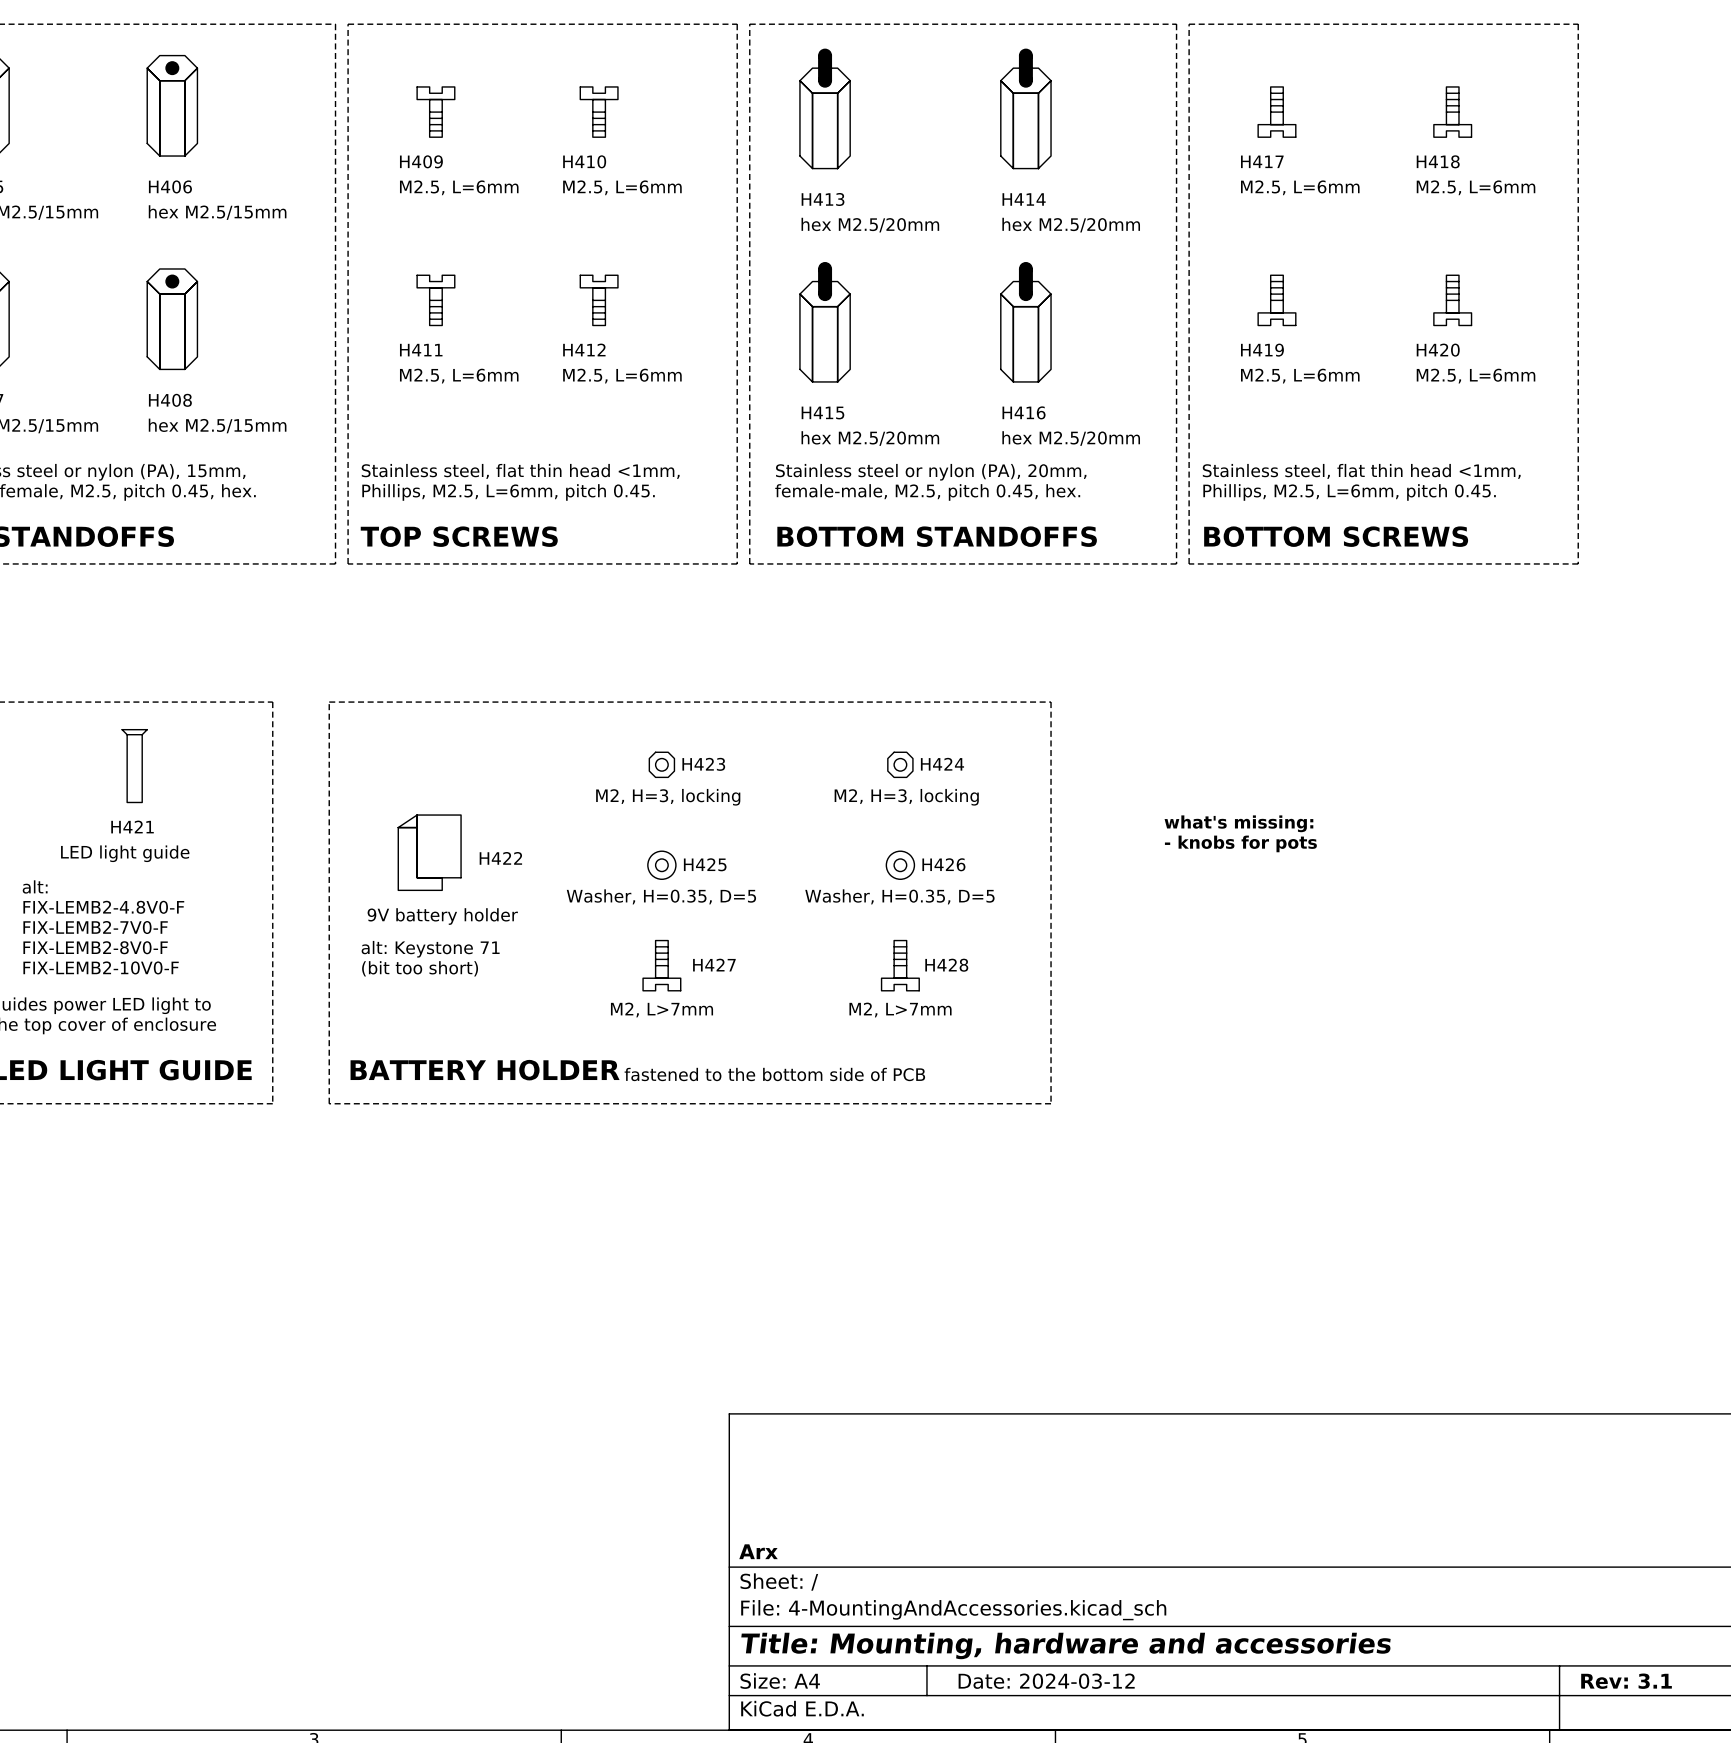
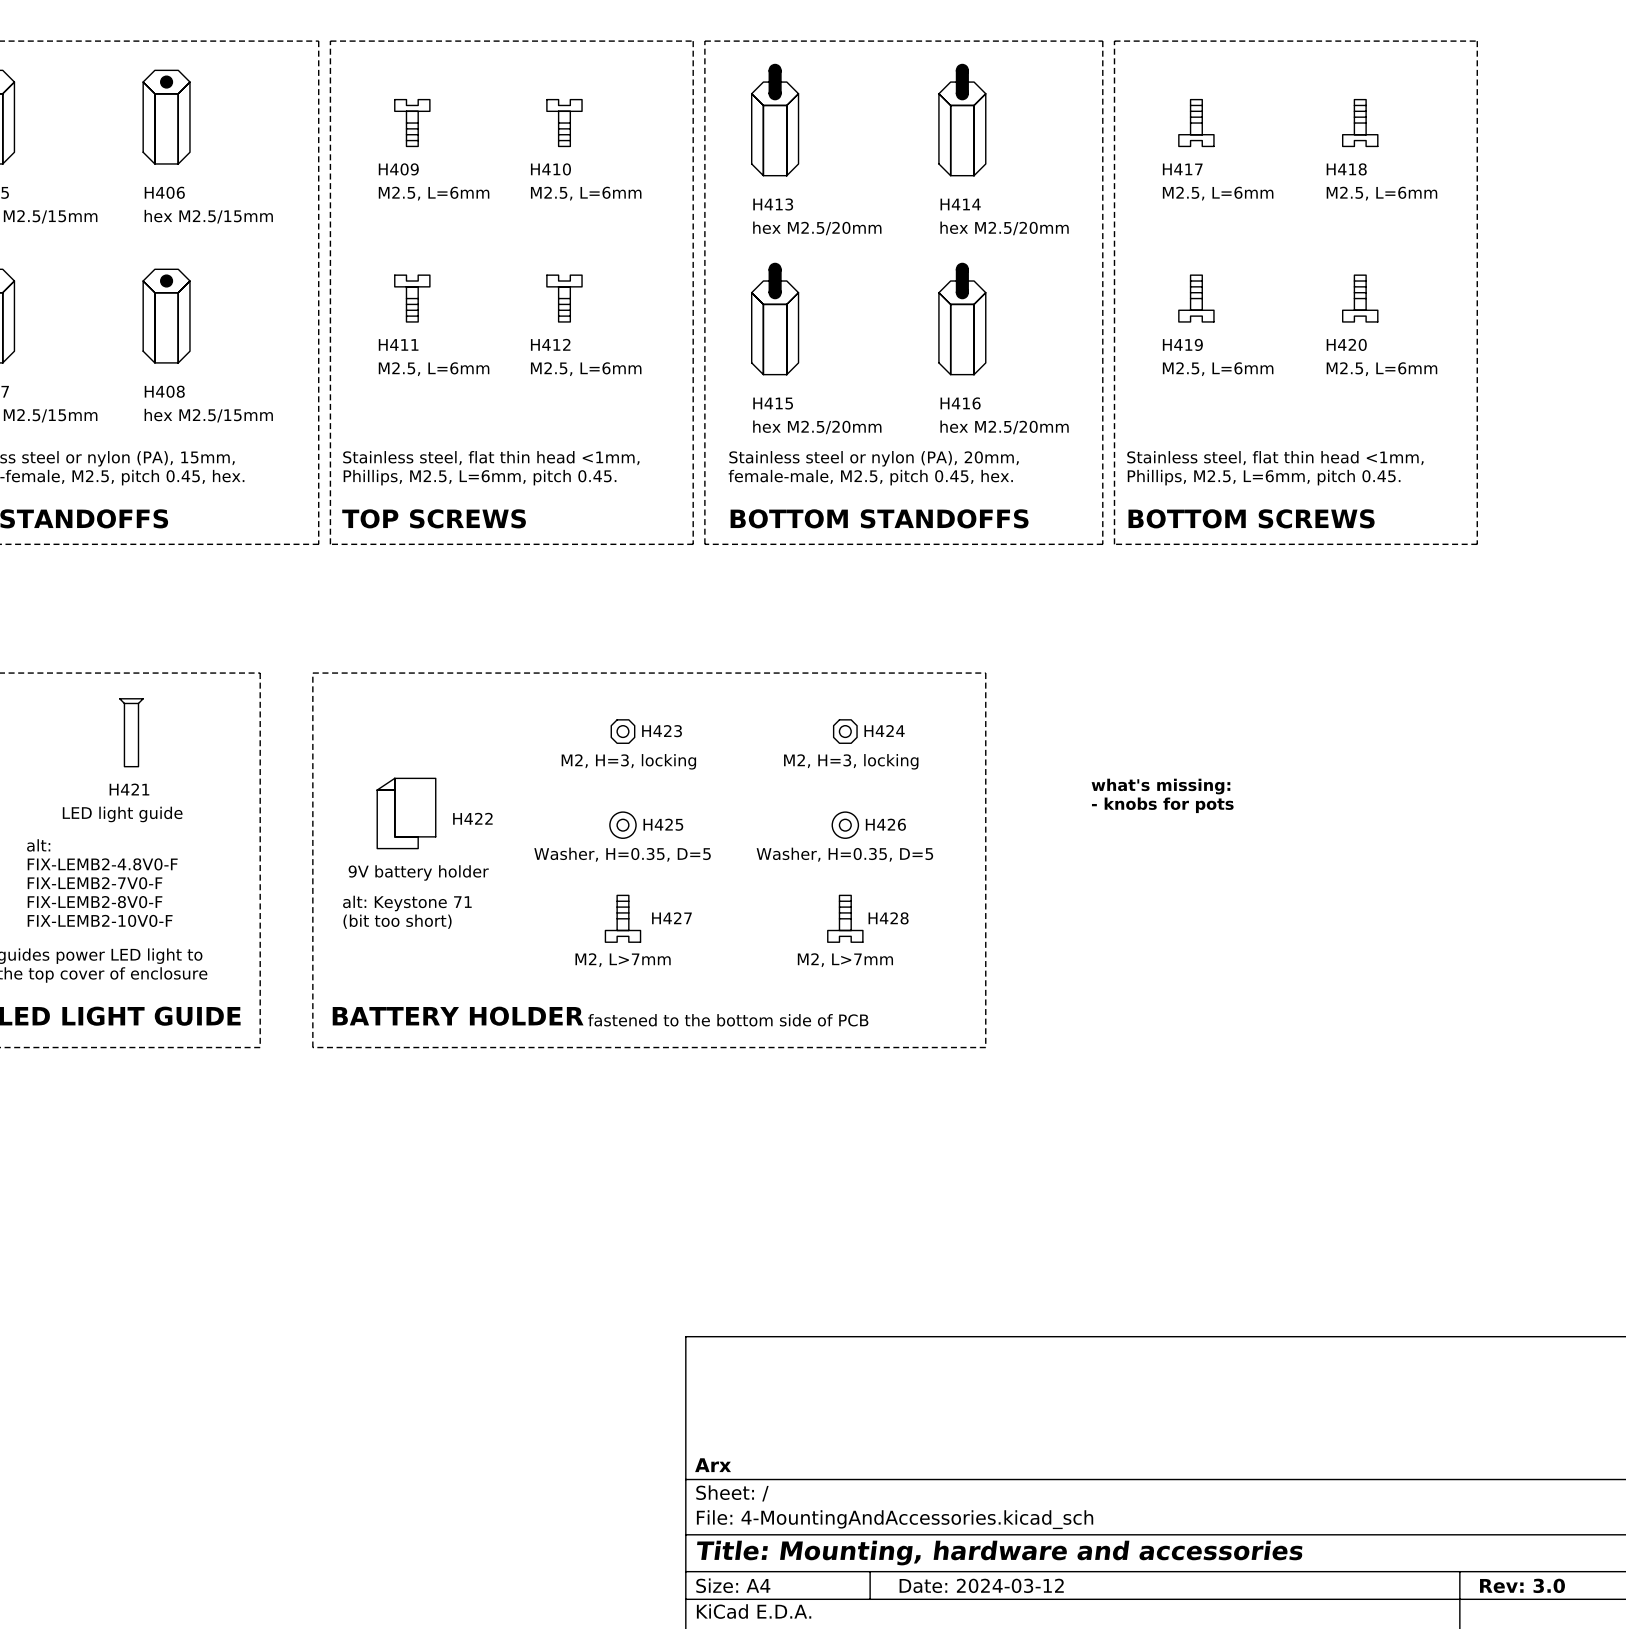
title block: Rev: 3.1 (1626, 1681) -> Rev: 3.0 (1522, 1585)

